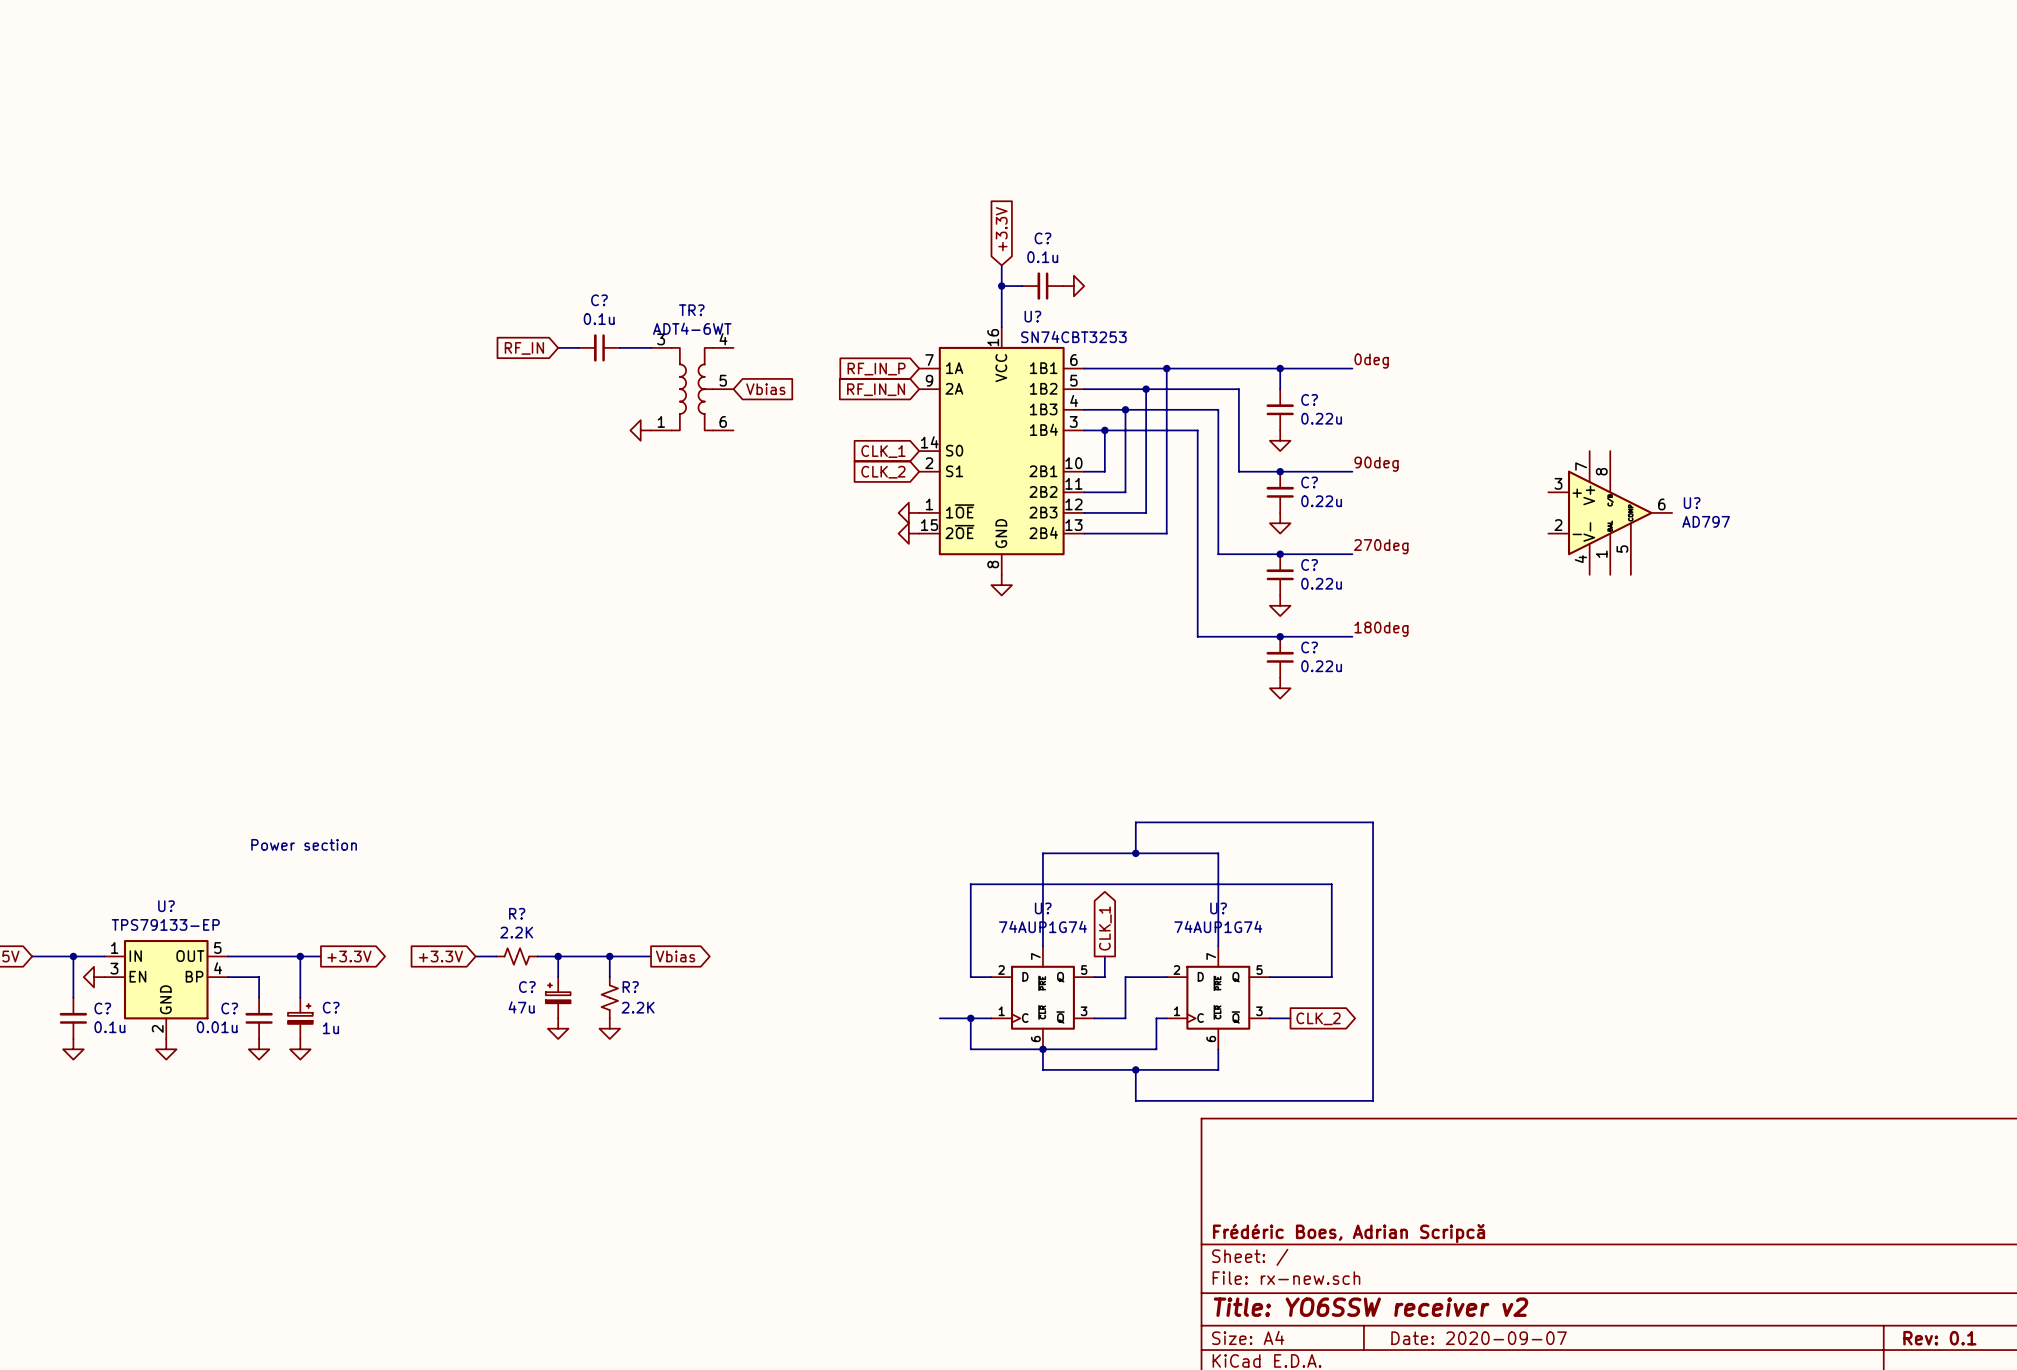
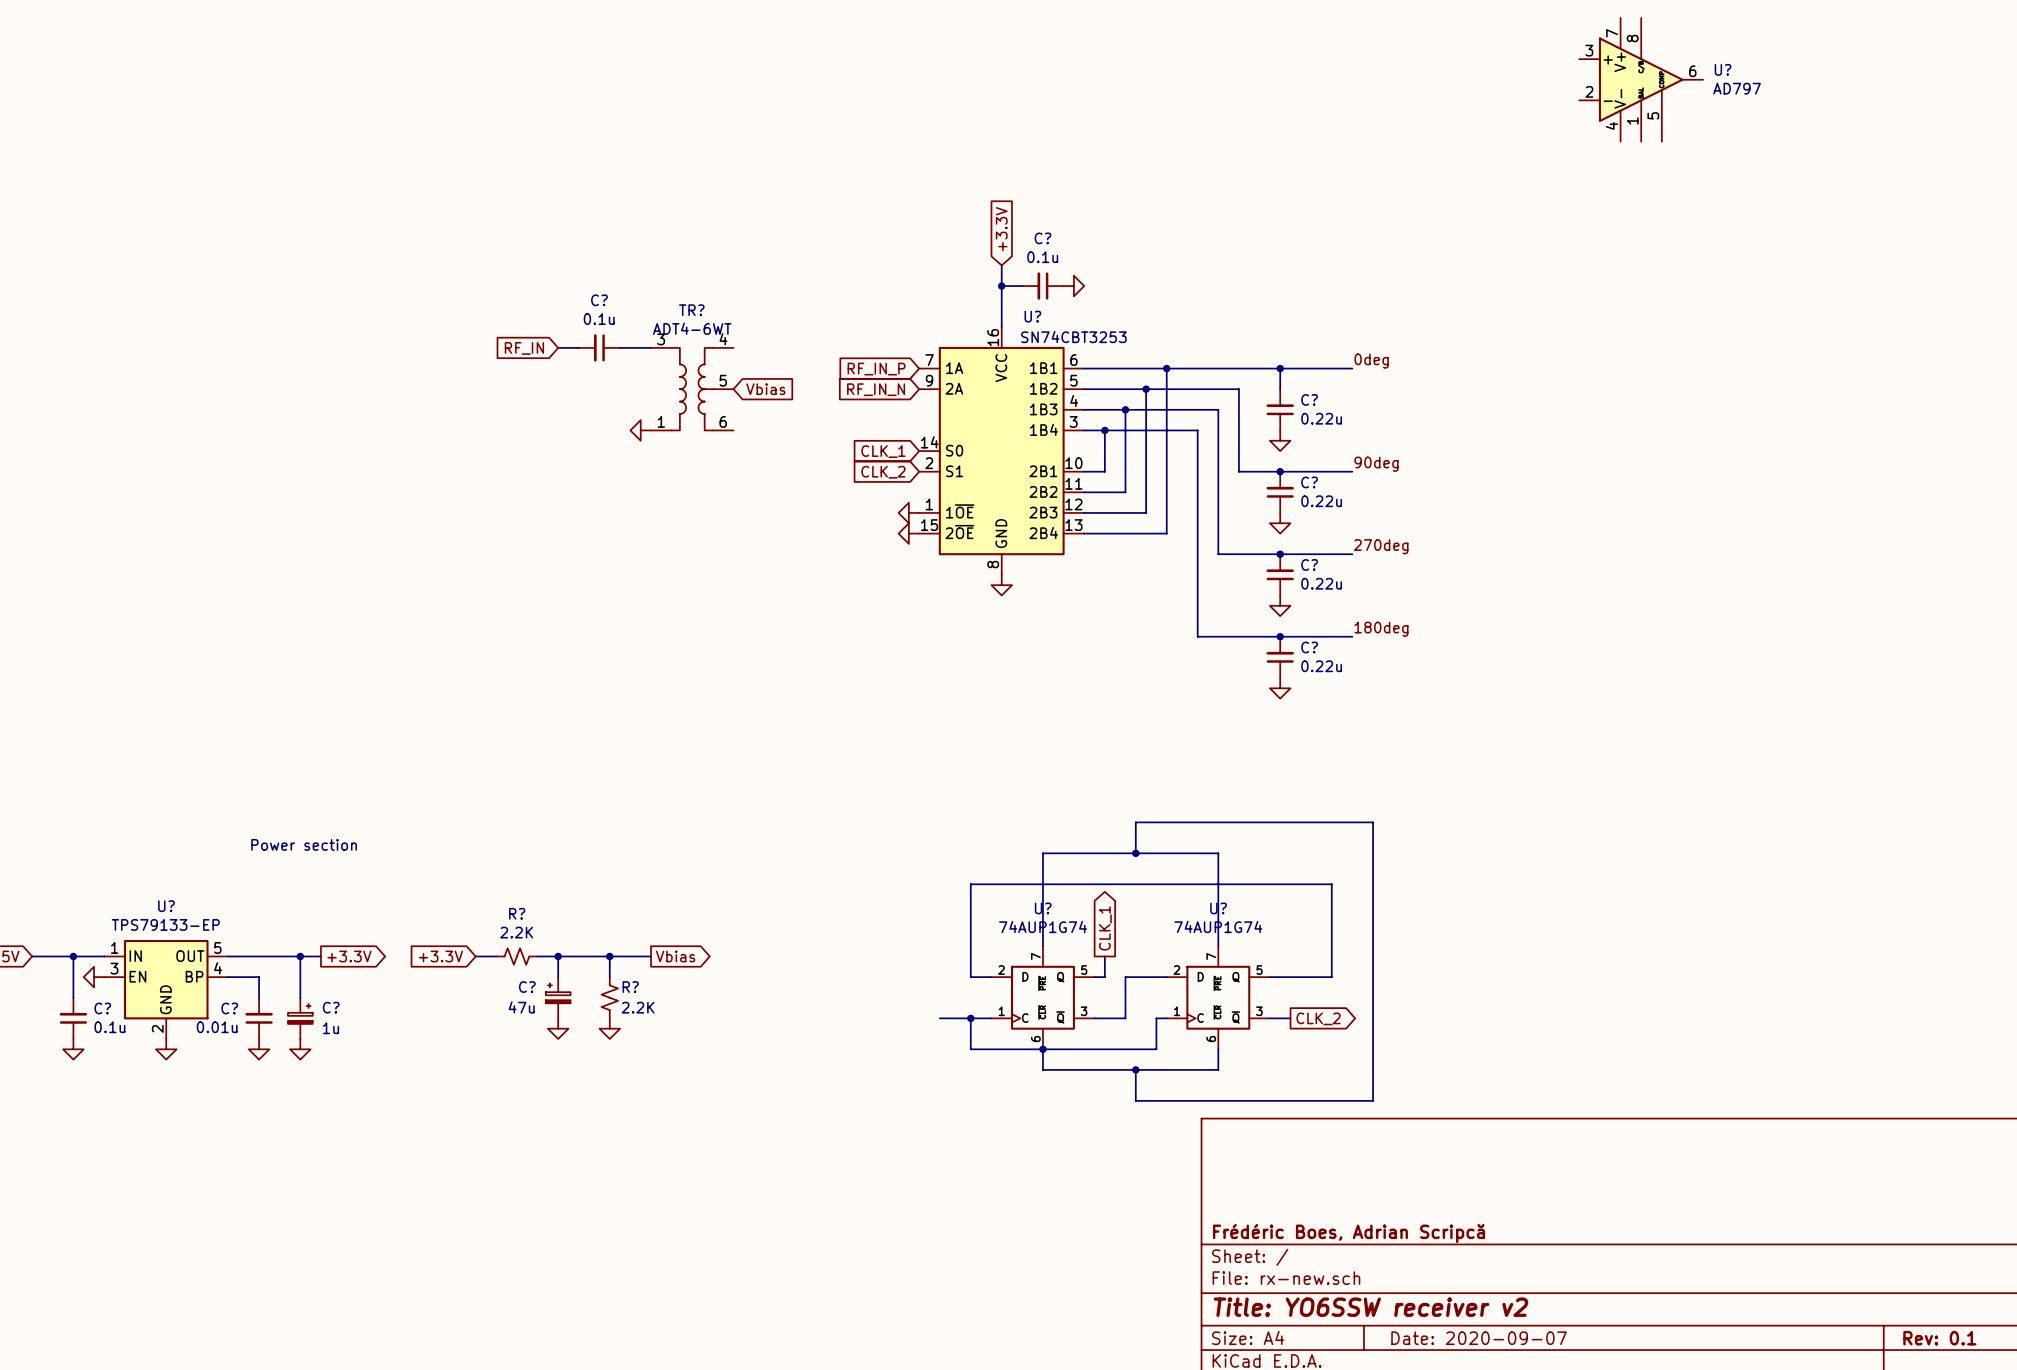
U?: none -> AD797 (1641, 79)
U?: AD797 (1610, 512) -> none

